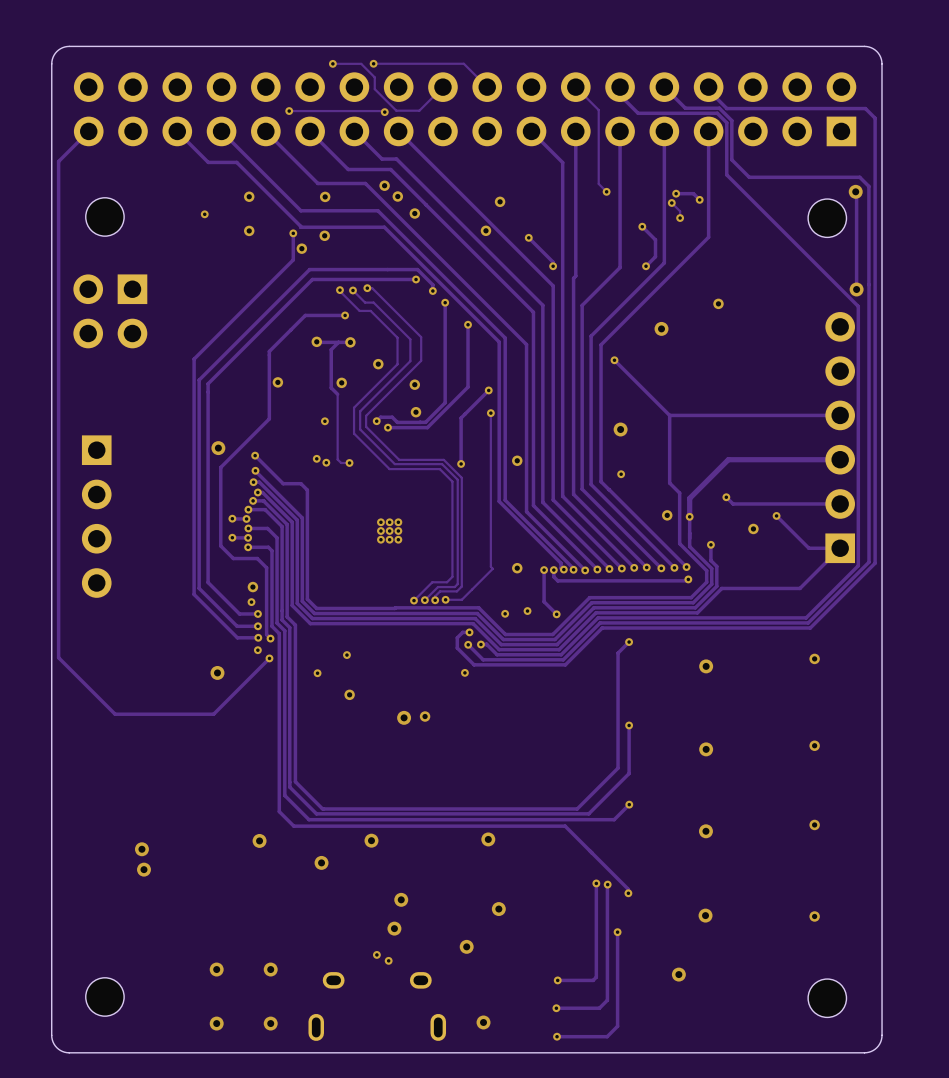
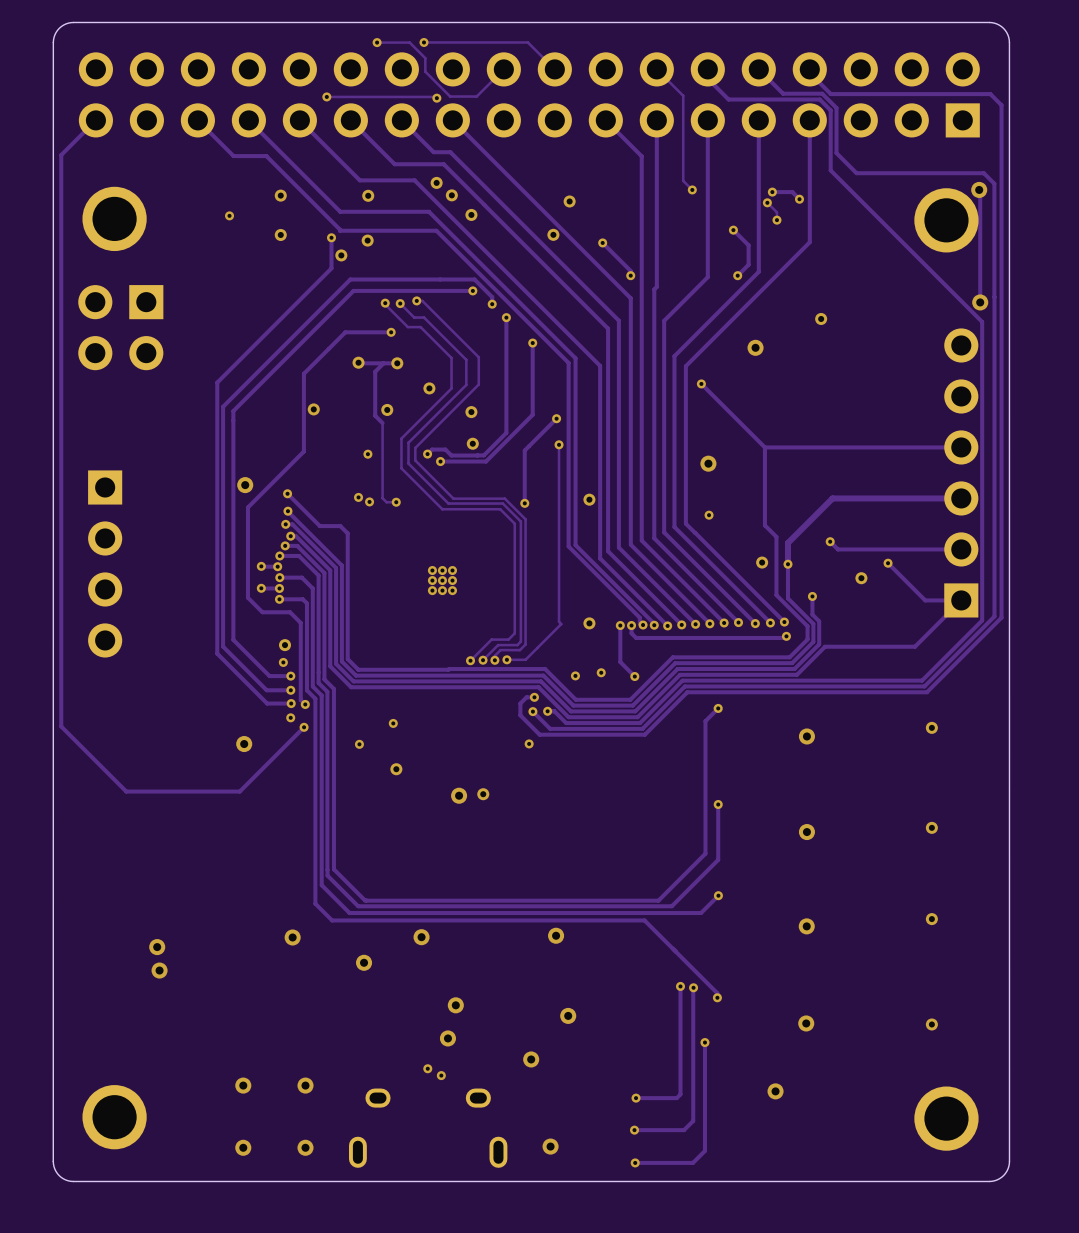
part footprint: [85, 197, 125, 237] -> [82, 186, 147, 252]
part footprint: [808, 199, 847, 238] -> [914, 188, 979, 253]
part footprint: [85, 977, 125, 1017] -> [82, 1085, 147, 1150]
part footprint: [808, 979, 847, 1018] -> [914, 1086, 979, 1151]

